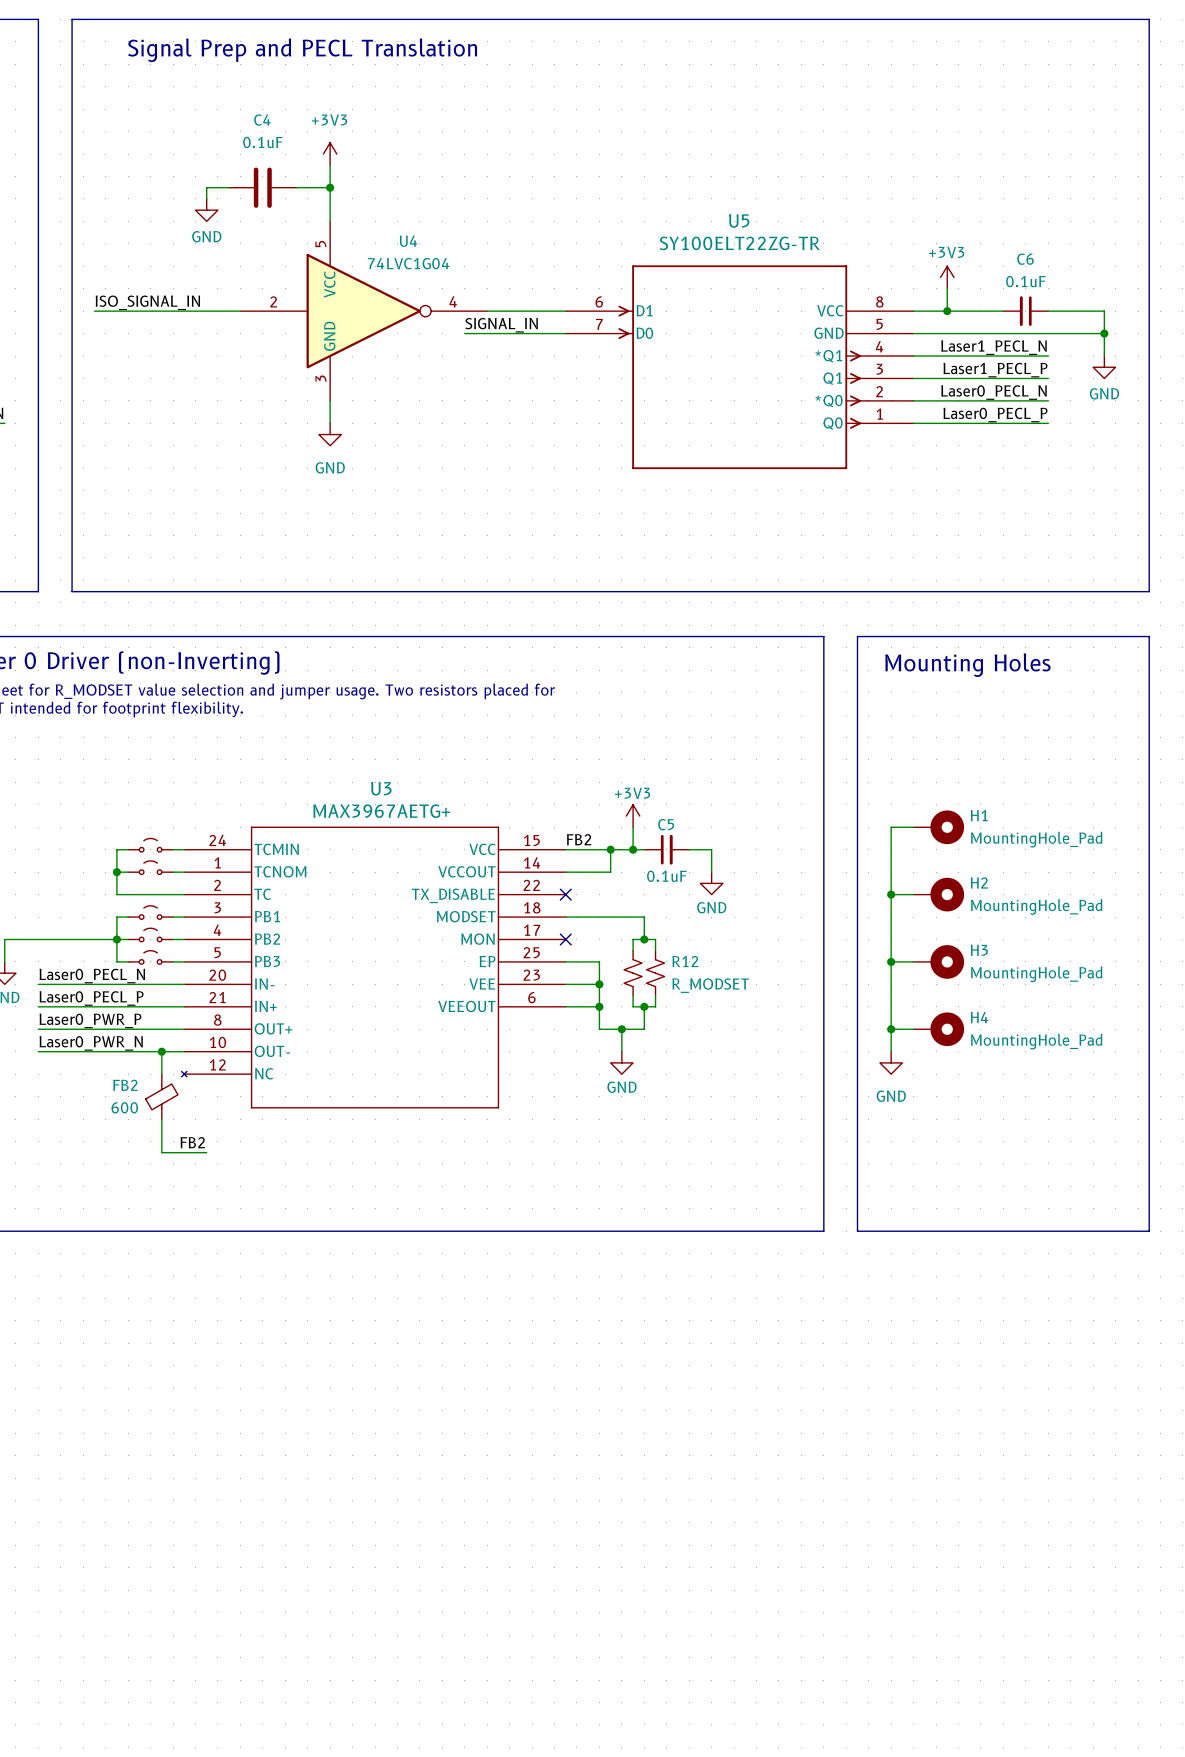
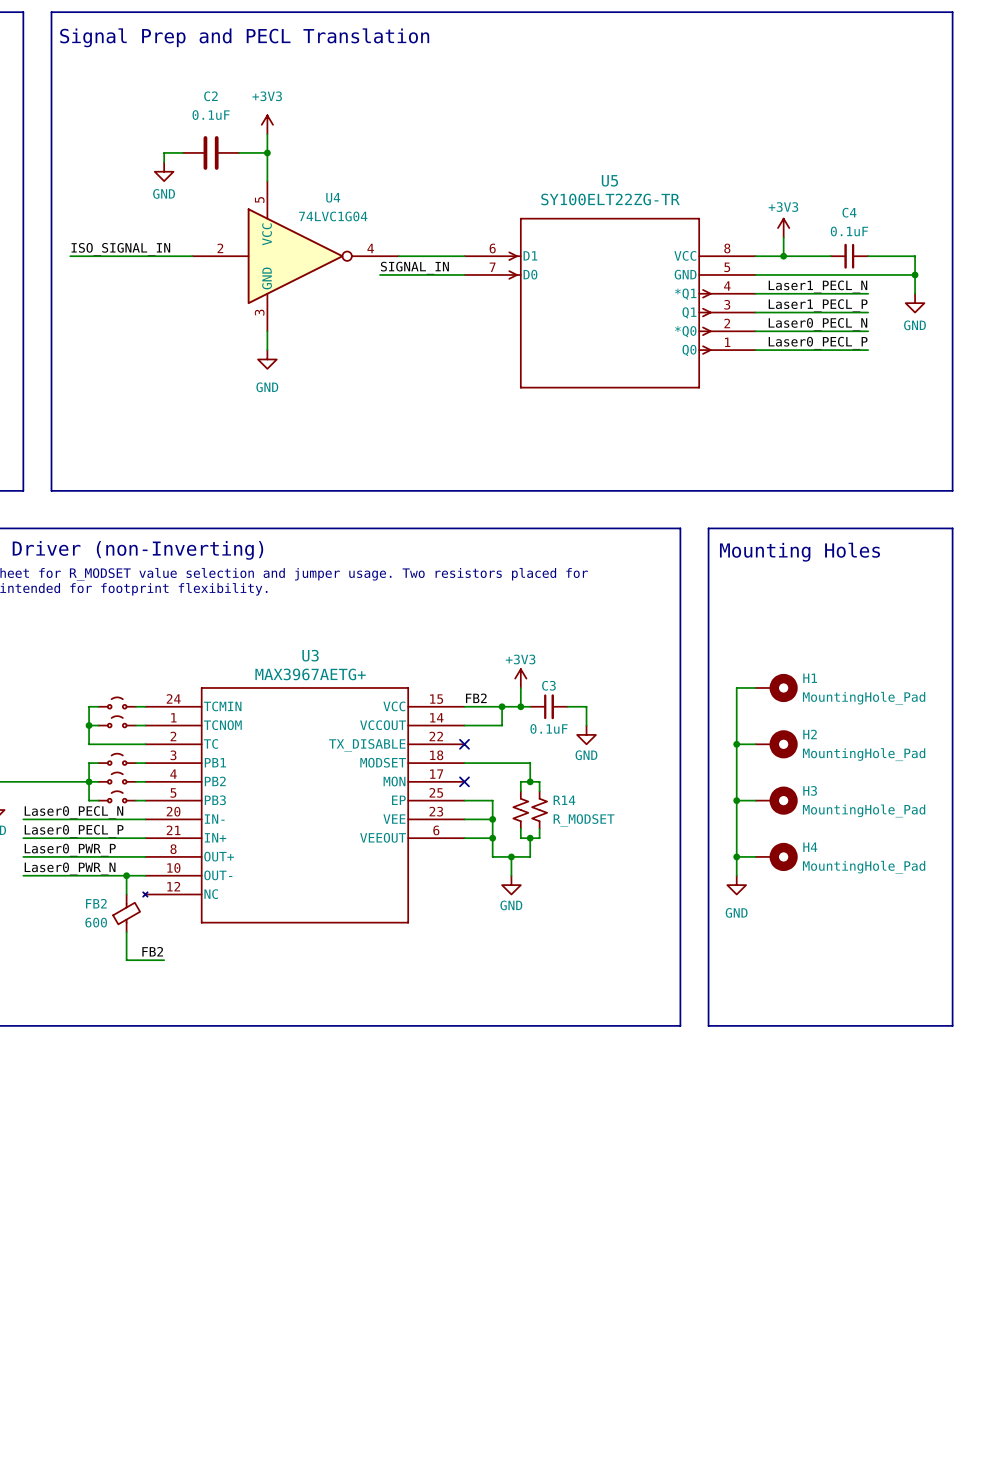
C4 name: C4 (262, 120) -> C2 (210, 96)
C6 name: C6 (1025, 259) -> C4 (849, 212)
C5 name: C5 (666, 824) -> C3 (548, 685)
R12 name: R12 (685, 961) -> R14 (564, 800)

